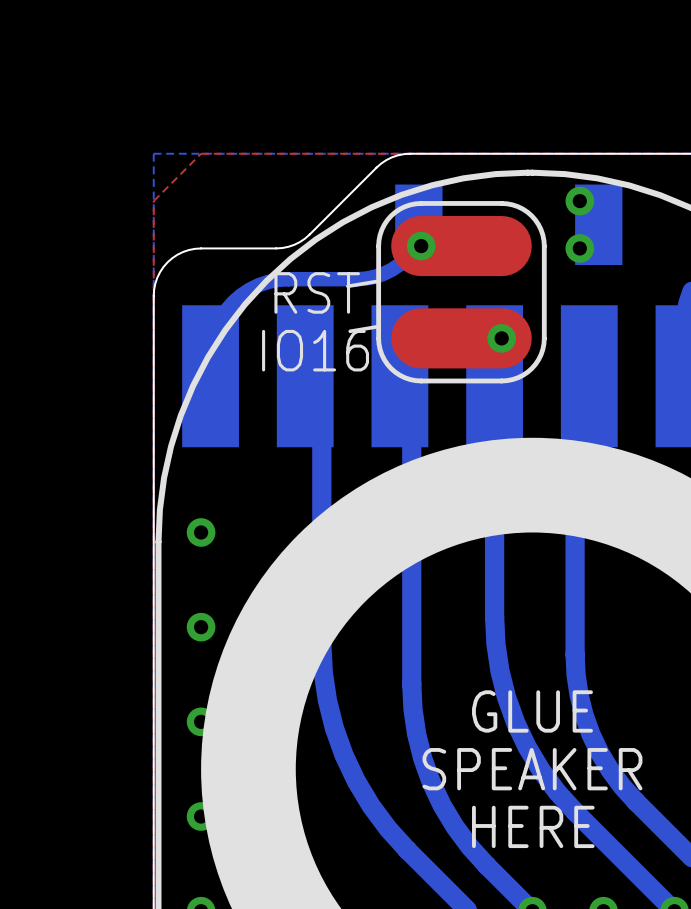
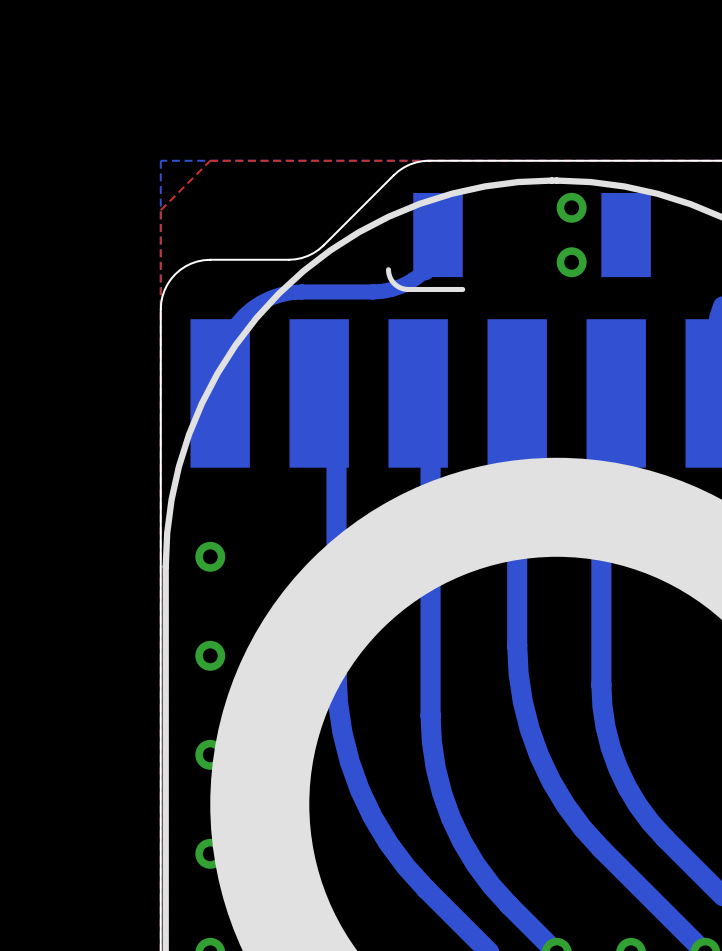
via: none -> (571, 207)
via: (579, 201) -> none
line: (421, 203) (507, 203) (527, 212) (538, 224) (544, 246) (543, 343) (535, 364) (523, 375) (501, 380) (415, 380) (395, 372) (384, 359) (378, 338) (380, 235) (387, 220) (395, 212) (404, 206) (421, 203) -> none
top track: (421, 246) (501, 246) -> none
via: (421, 246) -> none
via: (579, 248) -> none
via: none -> (571, 262)
line: none -> (388, 269) (392, 281) (403, 288) (462, 289)
line: (376, 281) (347, 286) -> none
text: RST (317, 292) -> none
line: (378, 326) (350, 331) -> none
top track: (421, 338) (501, 338) -> none
via: (501, 338) -> none
text: IO16 (315, 350) -> none
text: GLUE (532, 711) -> none
text: SPEAKER (532, 769) -> none
text: HERE (533, 826) -> none

